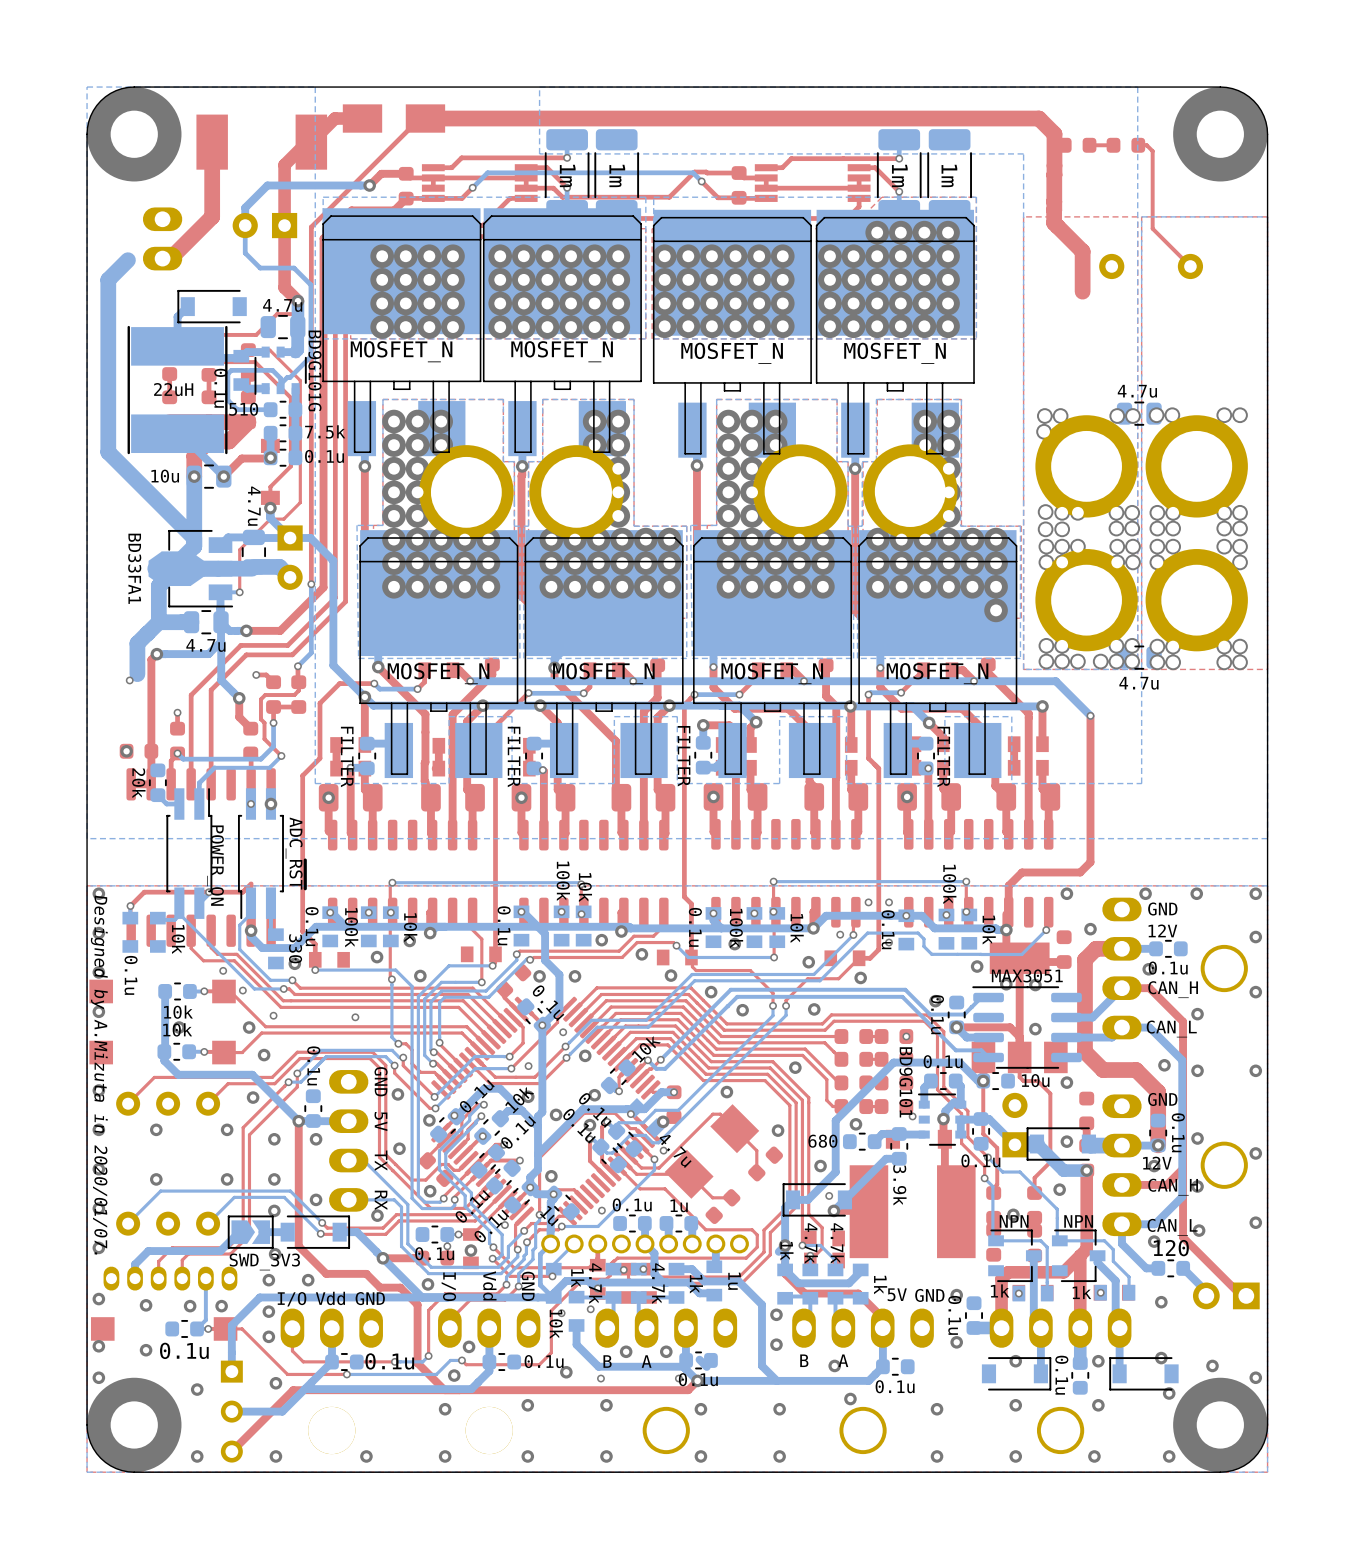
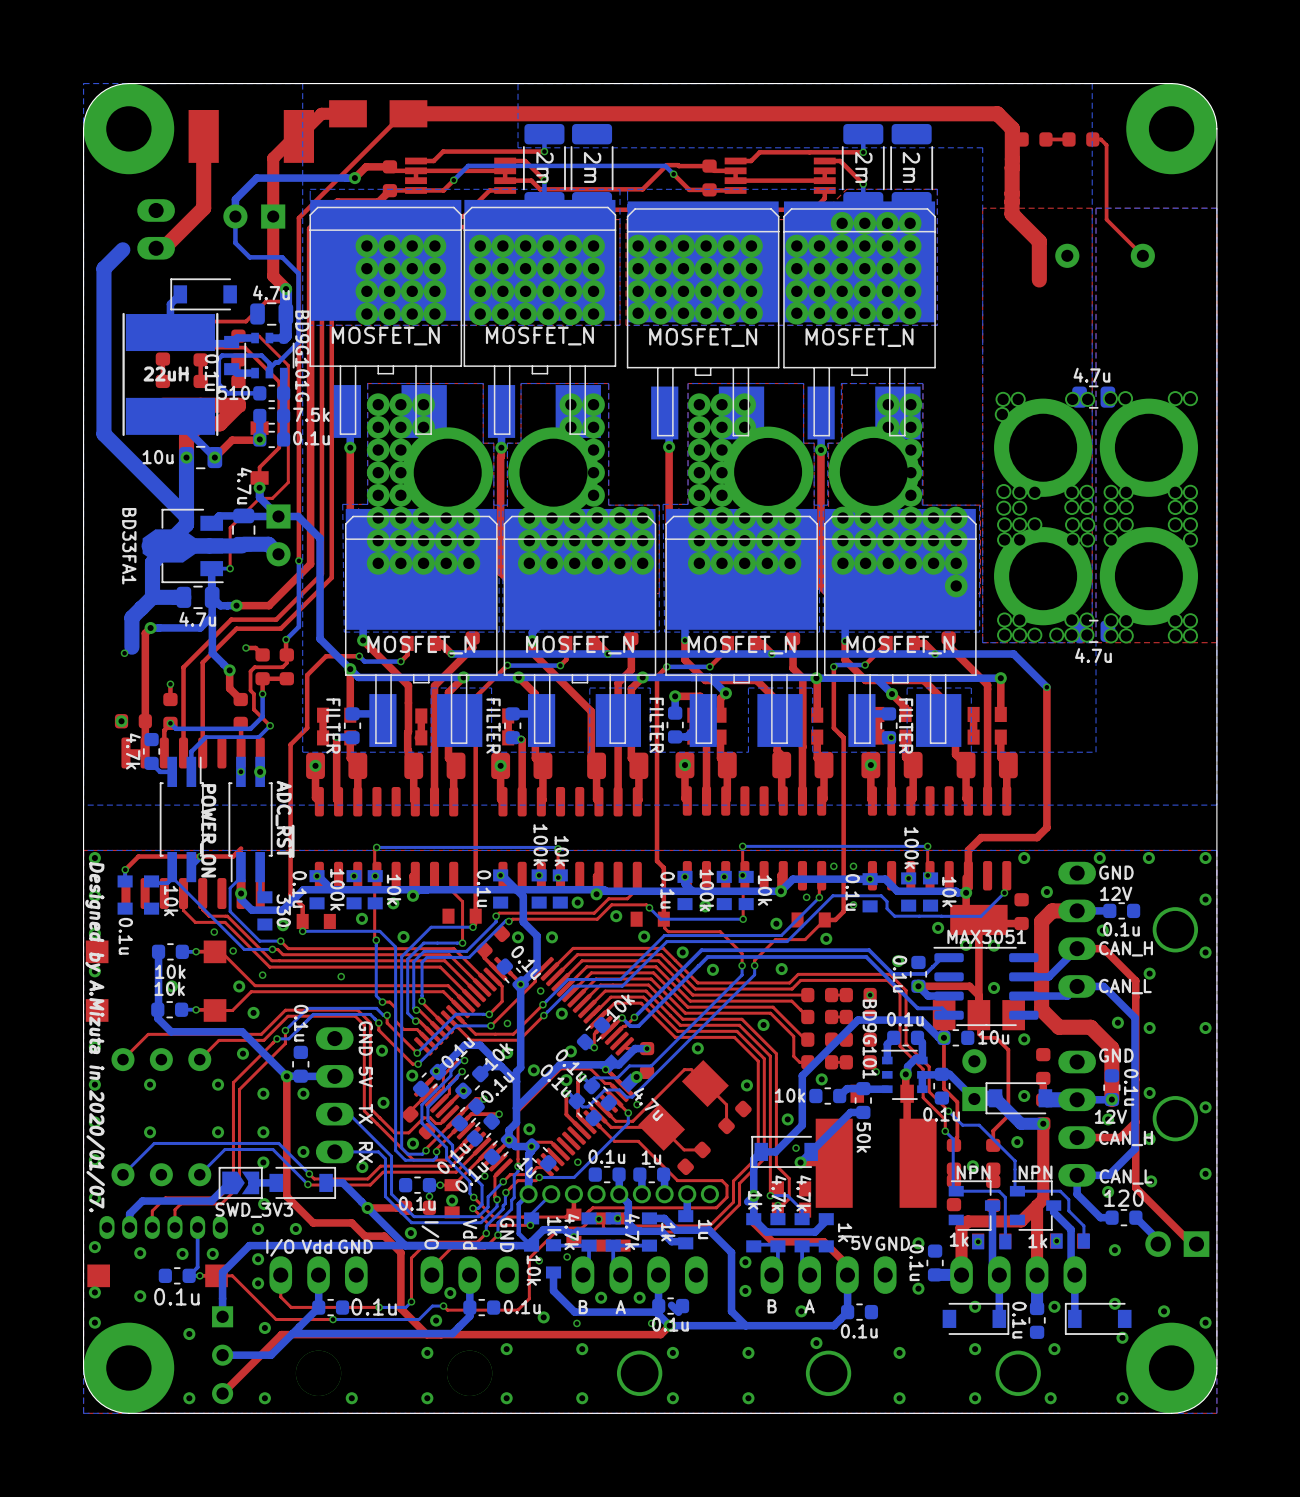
part value: 1m (567, 175) -> 2m (545, 167)
part value: 1m (617, 175) -> 2m (592, 167)
part value: 1m (899, 175) -> 2m (863, 167)
part value: 1m (949, 175) -> 2m (911, 167)
part value: 20k (138, 783) -> 4.7k (133, 751)
part value: 680 (822, 1141) -> 10k (790, 1095)
part value: 3.9k (899, 1185) -> 50k (863, 1137)

